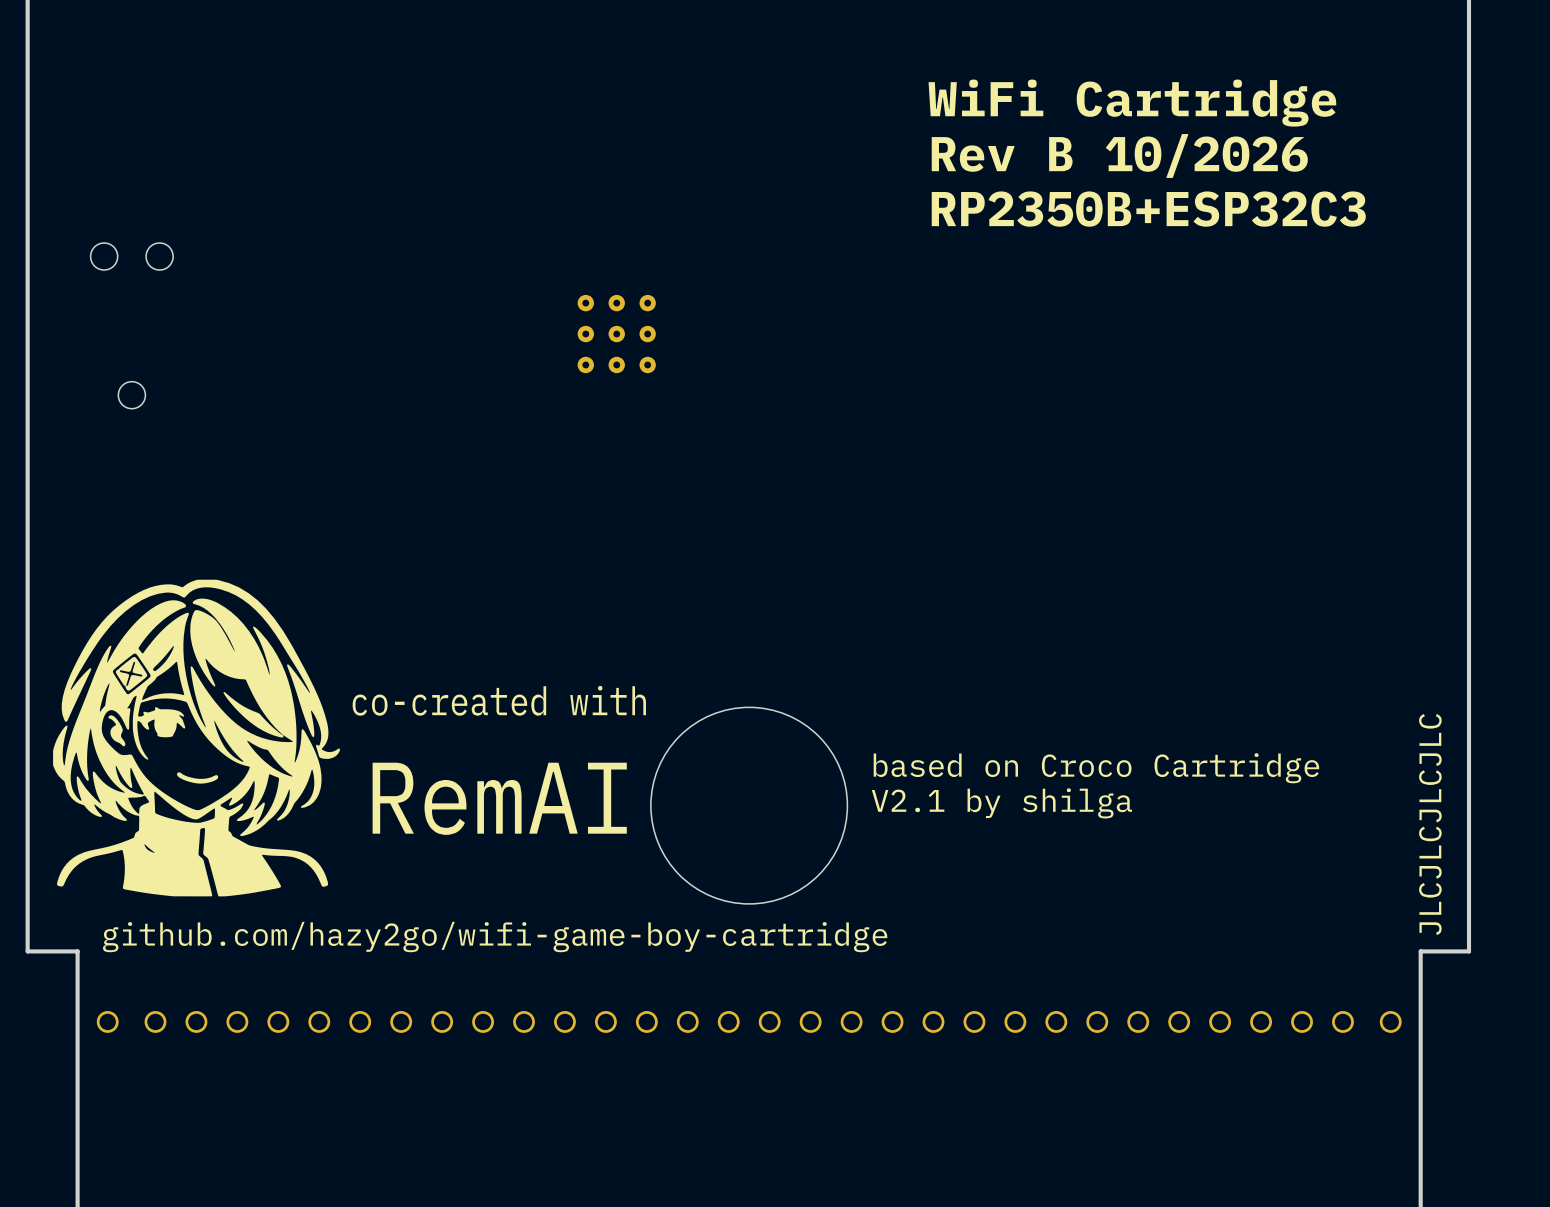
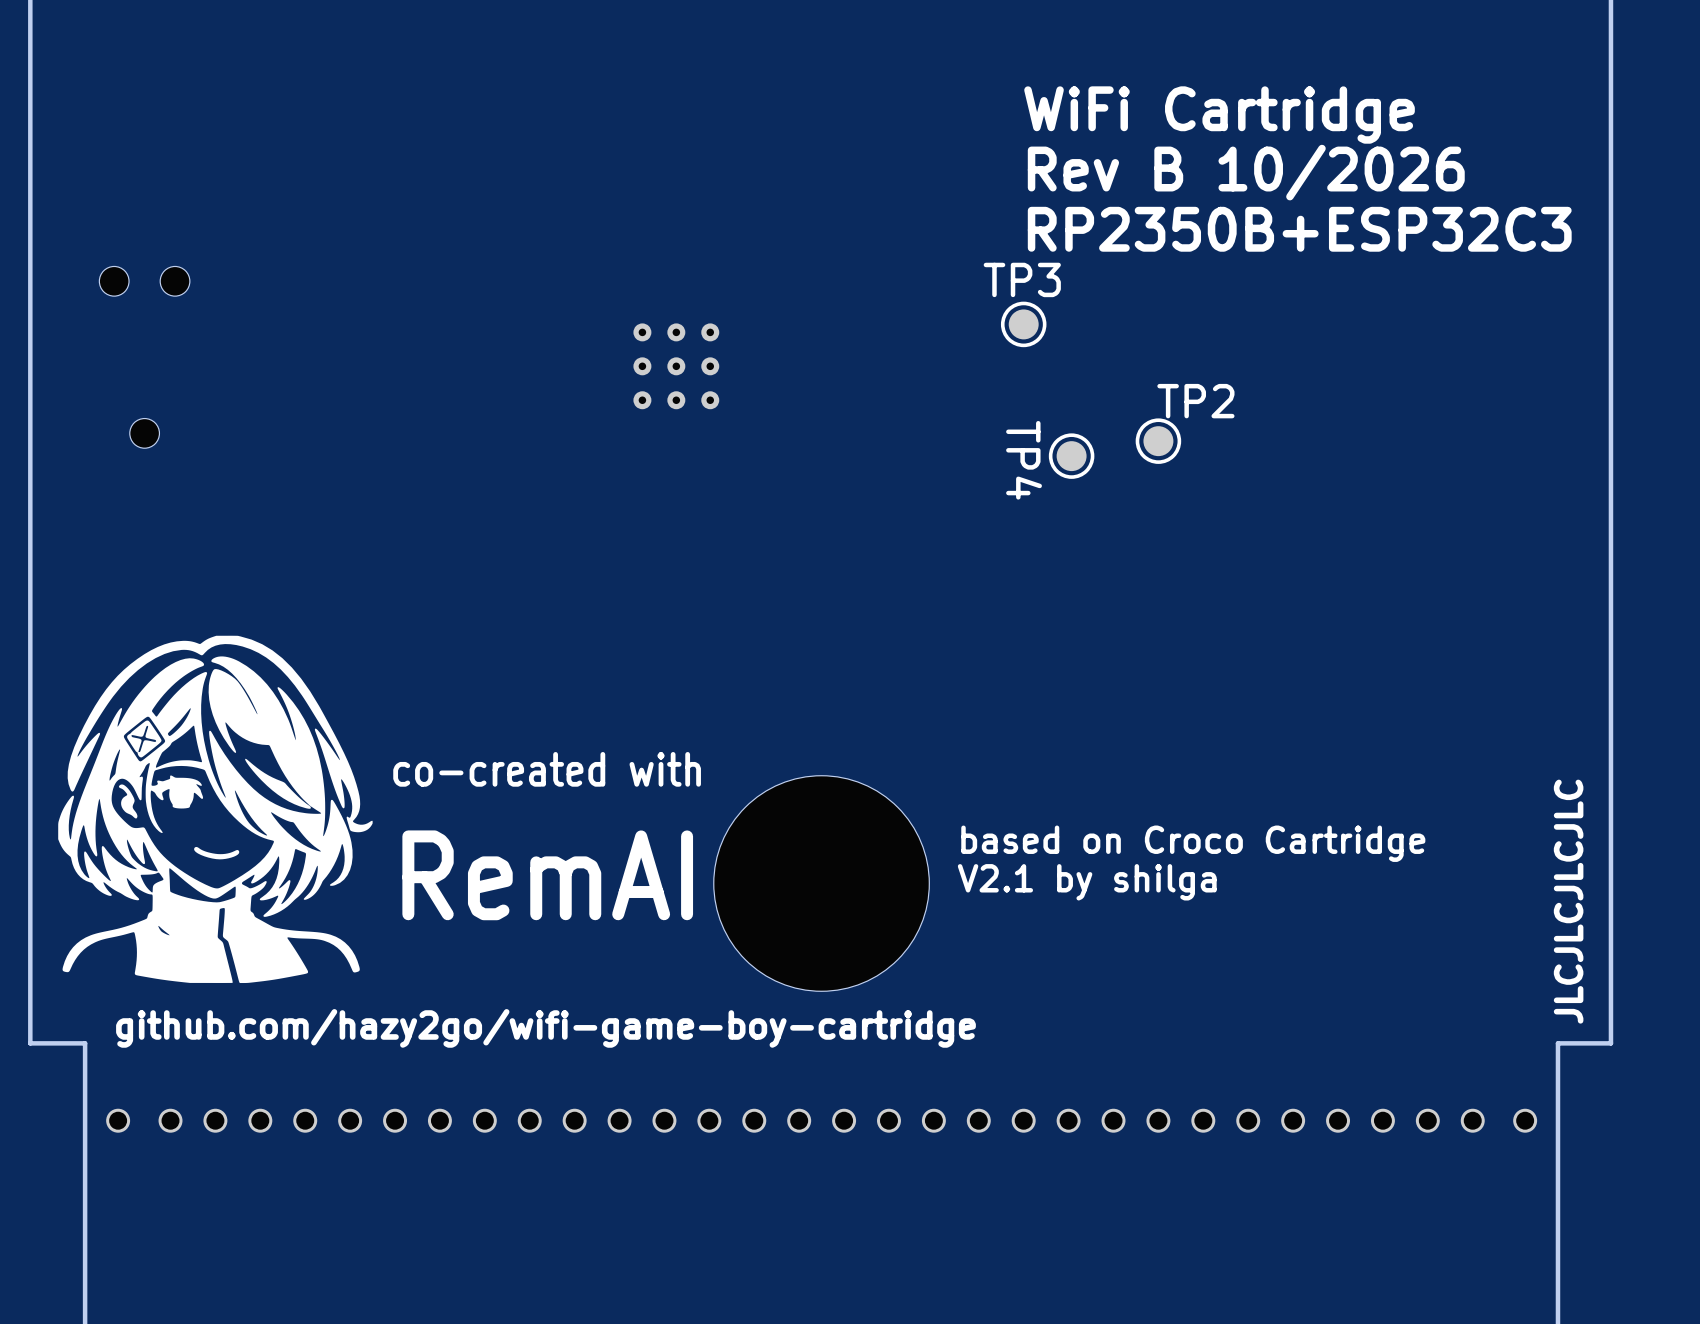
TP3: none -> (1023, 324)
TP2: none -> (1158, 441)
TP4: none -> (1071, 456)

